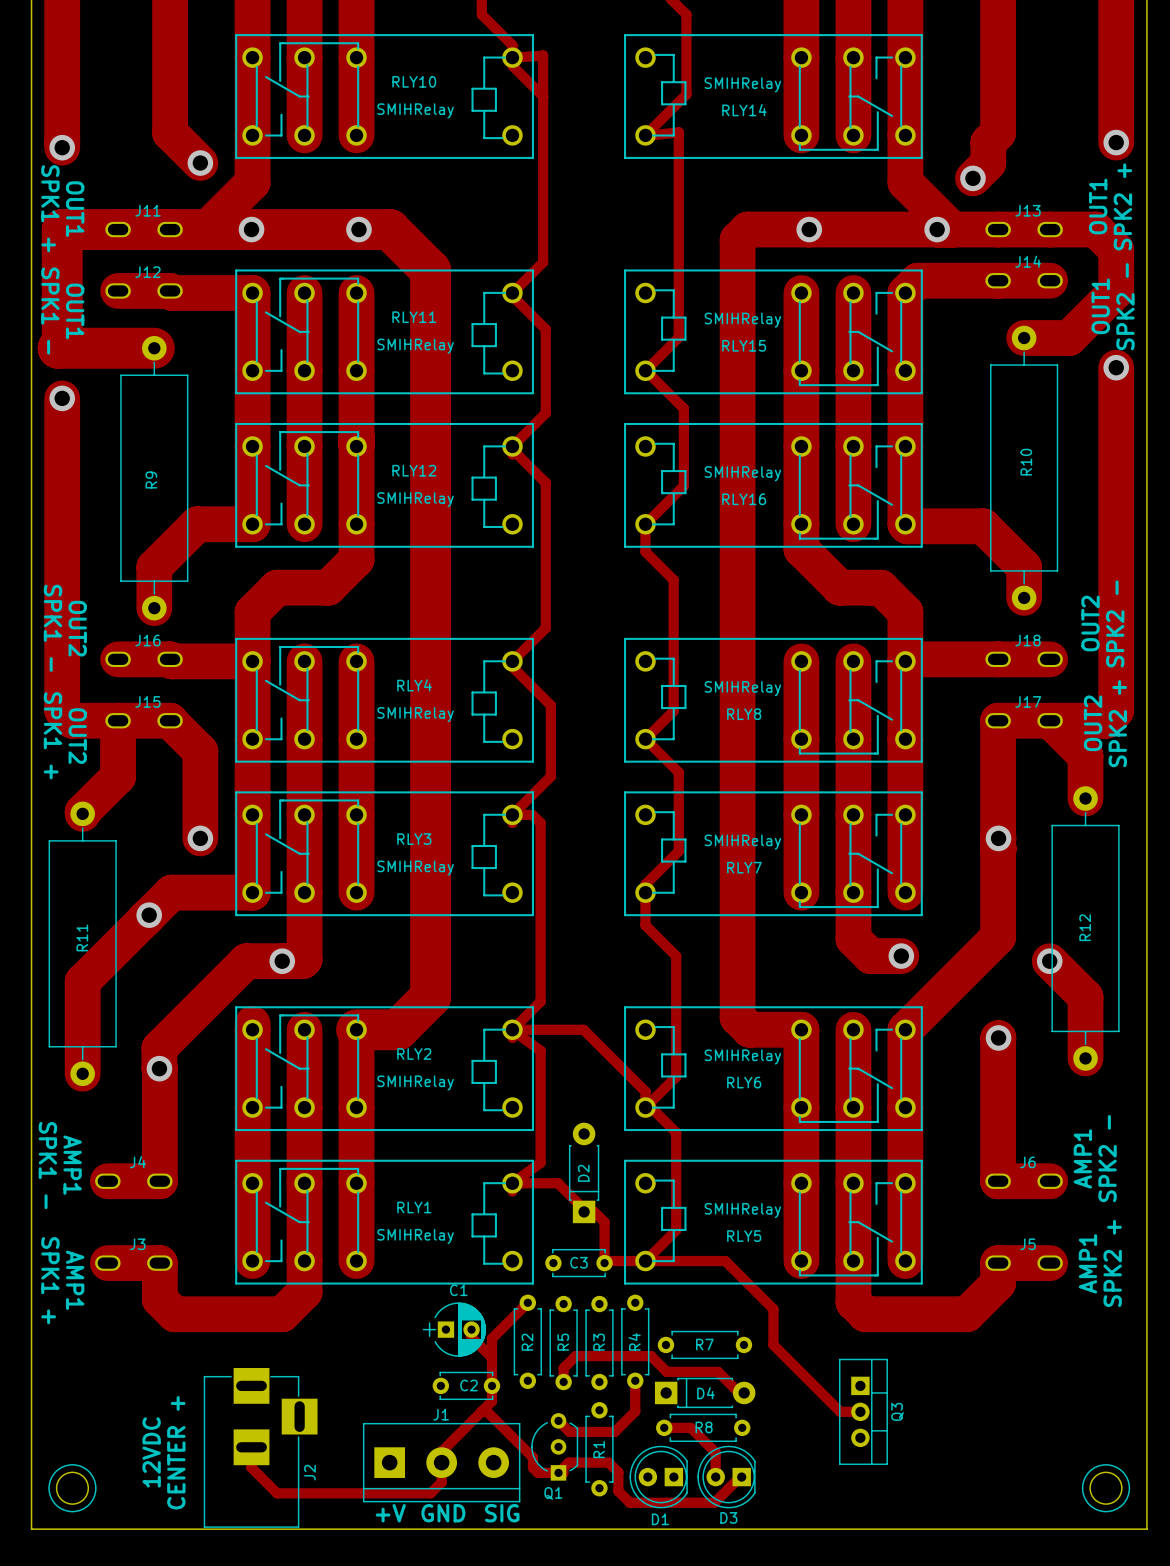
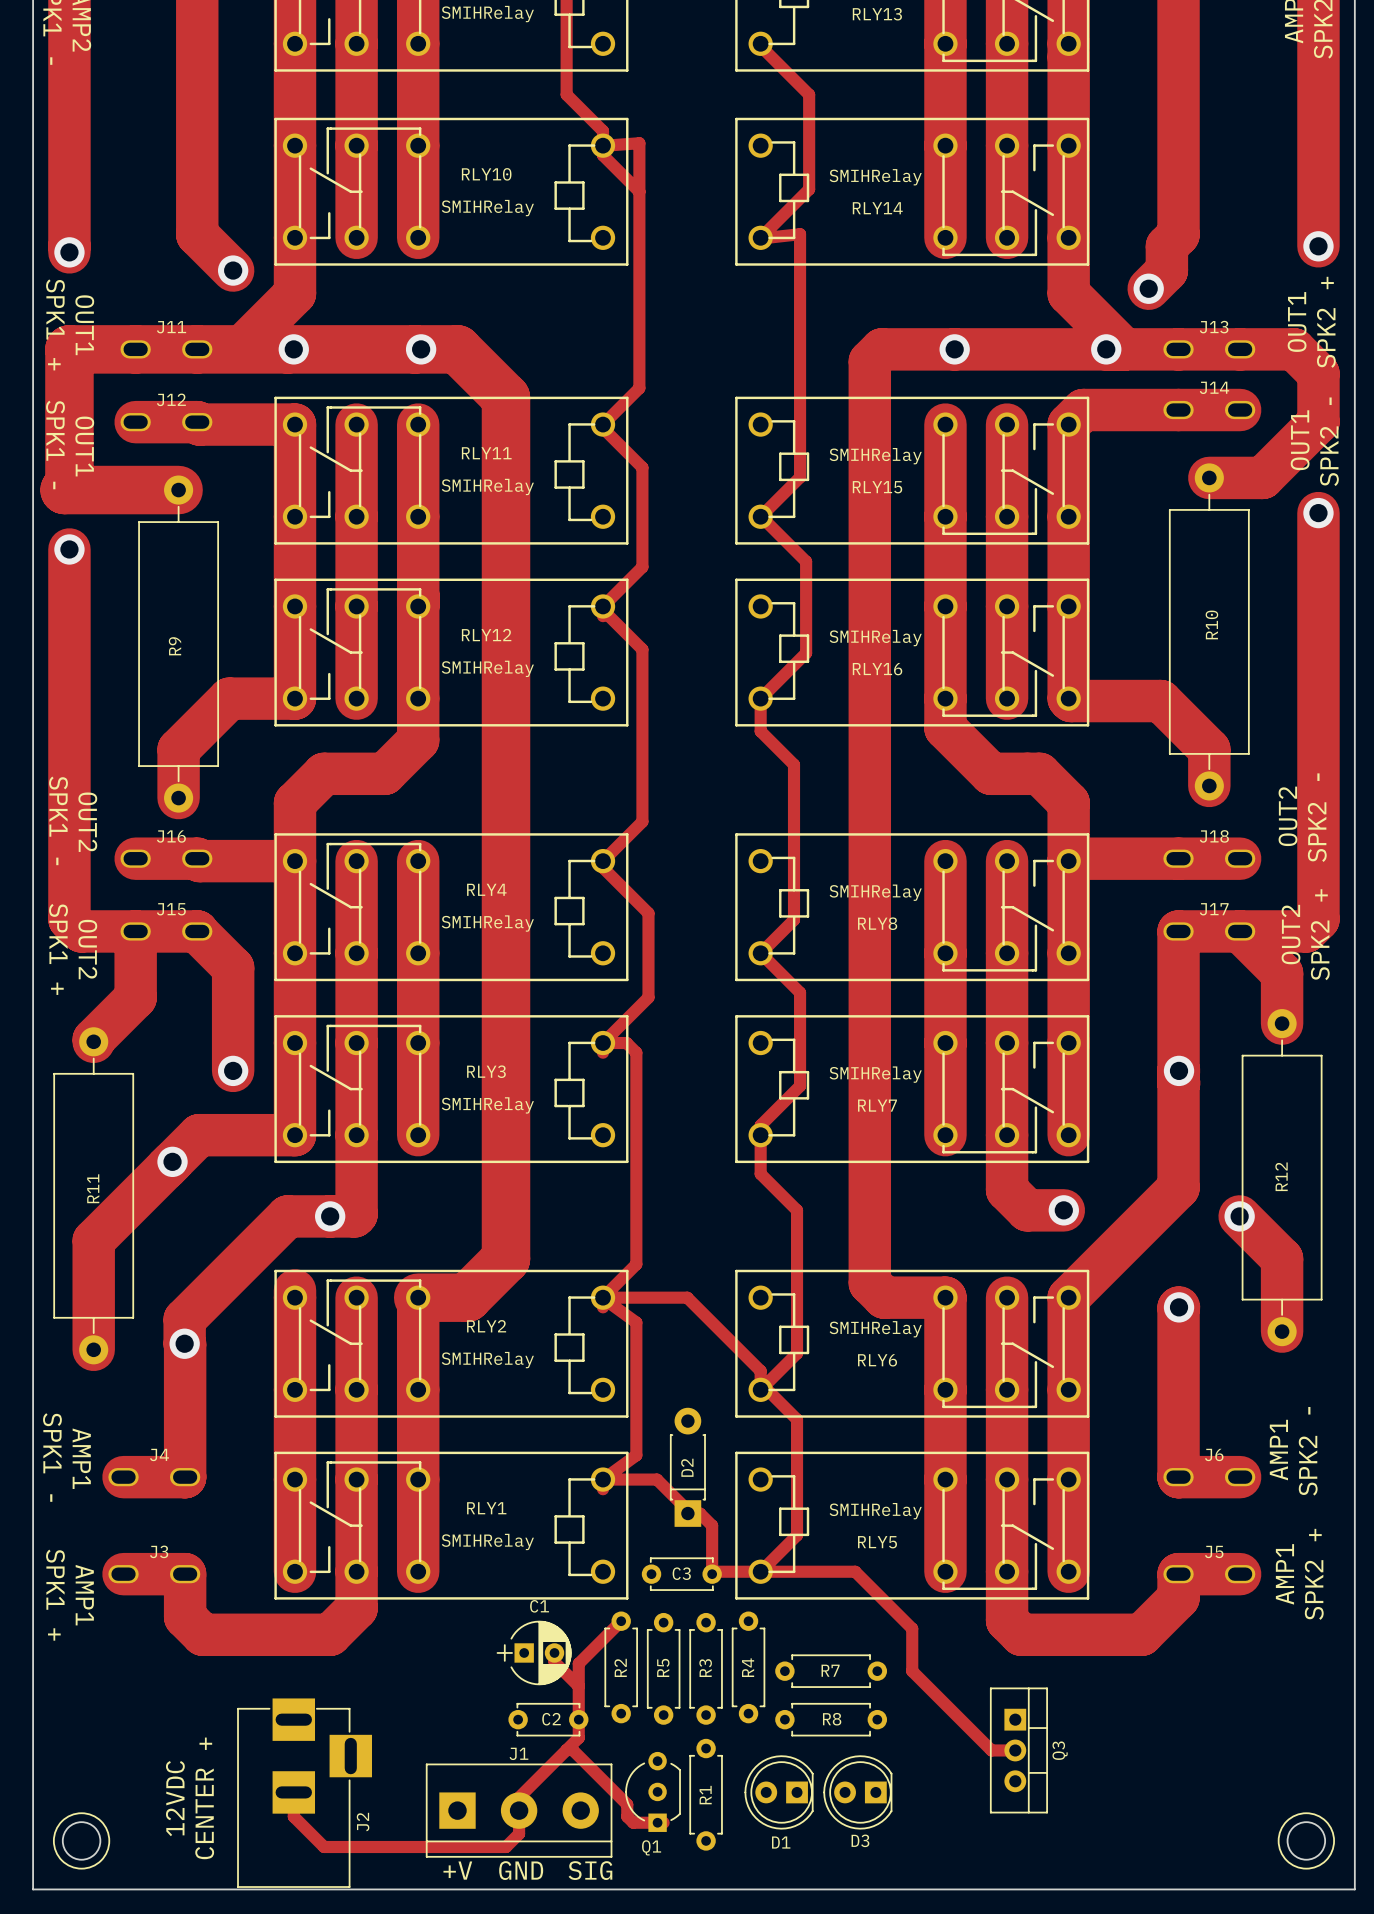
track: (635, 1380) (635, 1411) (614, 1431) (569, 1431) (558, 1420) -> none
track: (563, 1382) (563, 1368) (575, 1356) (651, 1356) (666, 1371) (718, 1371) (739, 1392) (744, 1392) -> none
D4: (705, 1392) -> none
track: (664, 1427) (690, 1427) (715, 1452) (715, 1477) -> none
R8 position: (703, 1427) -> (831, 1719)
track: (558, 1472) (568, 1462) (608, 1462) (618, 1472) (618, 1491) (629, 1502) (714, 1502) (741, 1477) -> none
D1 position: (658, 1477) -> (779, 1792)
D3 position: (726, 1477) -> (857, 1792)

